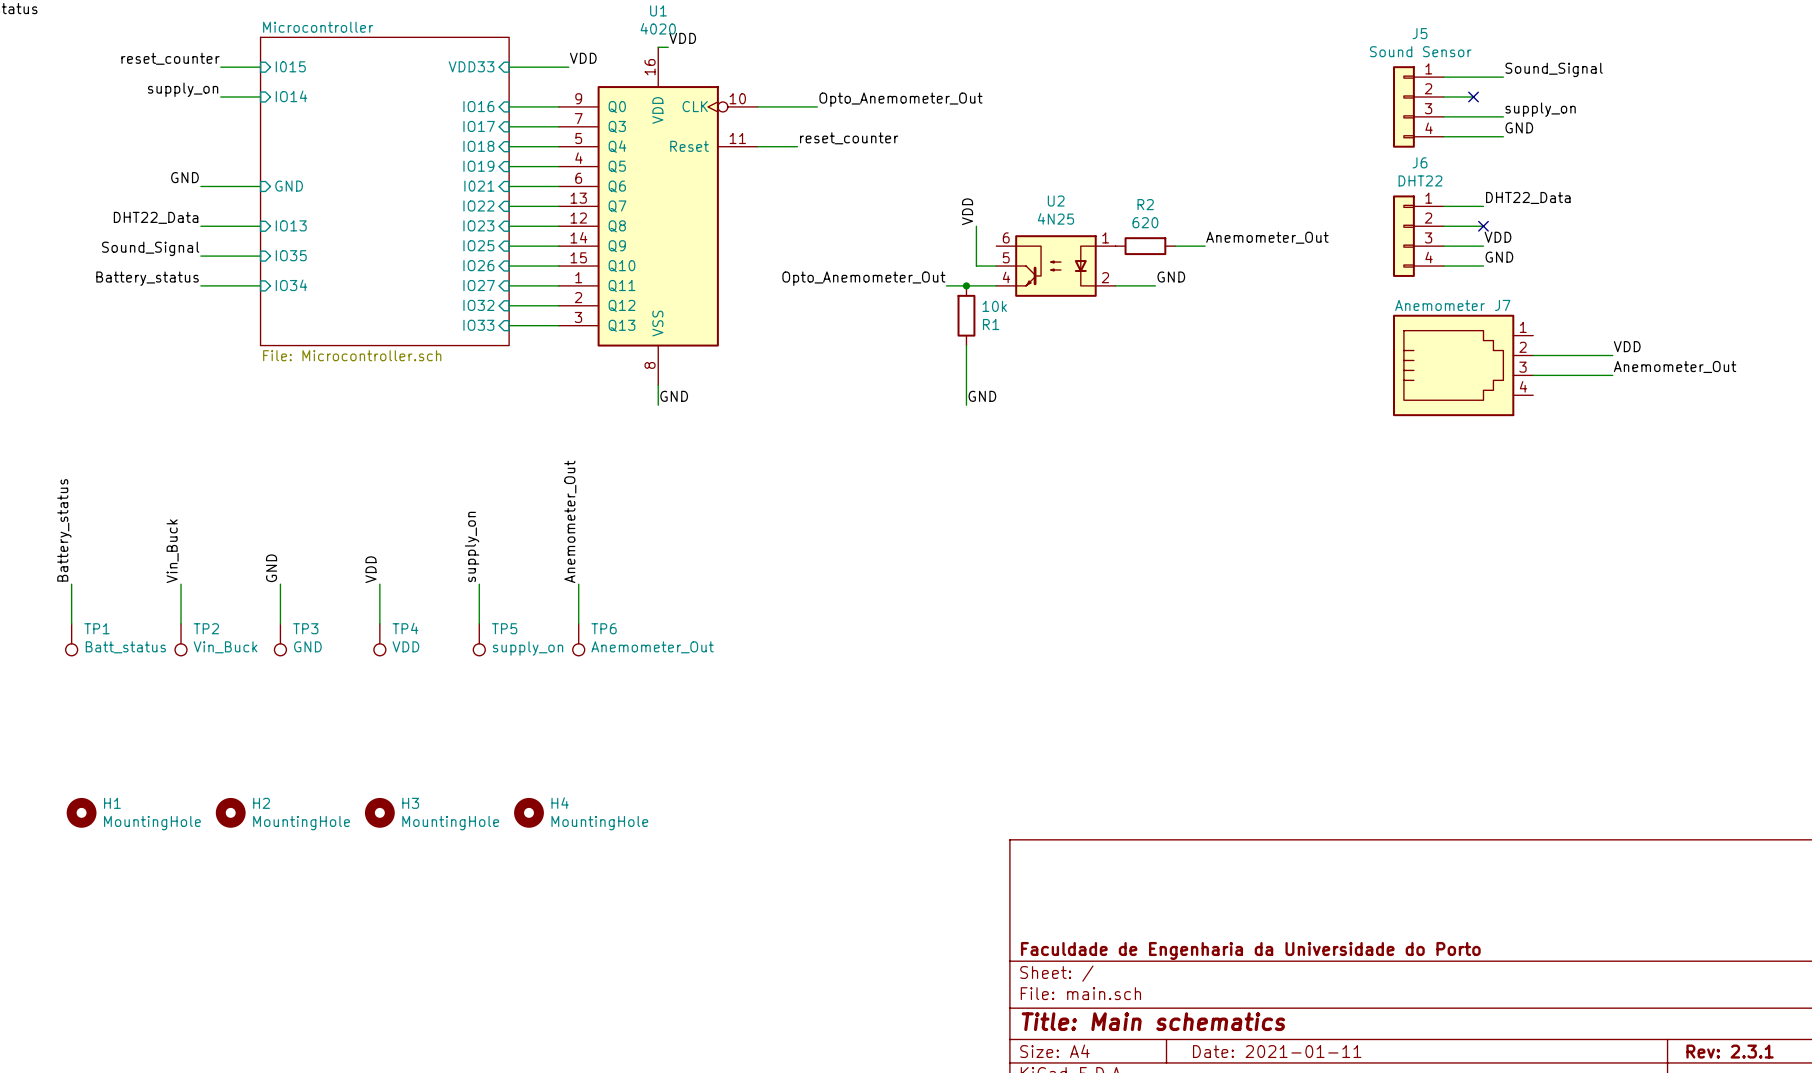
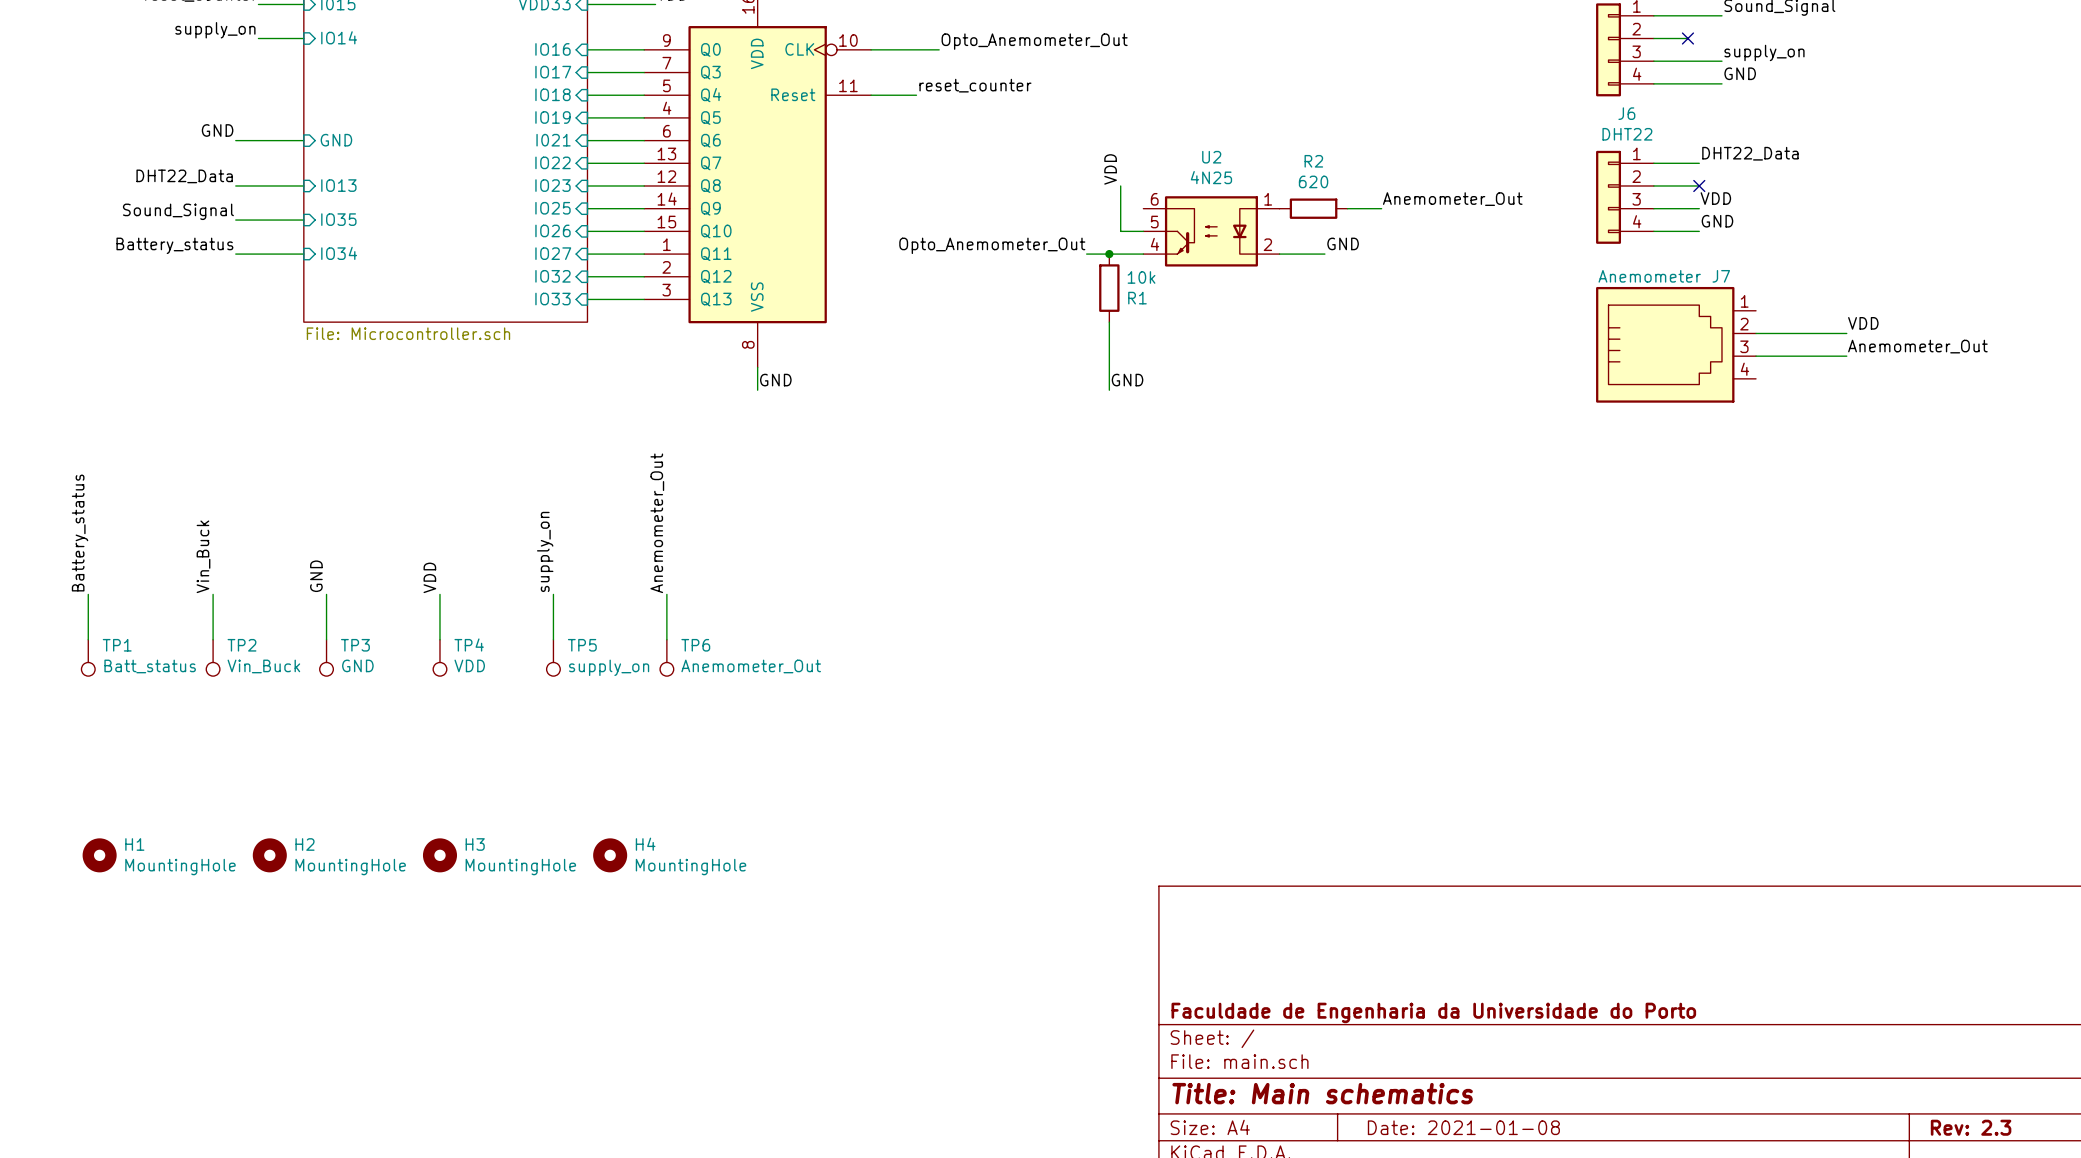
title block: Date: 2021-01-11 (1277, 1051) -> Date: 2021-01-08 (1463, 1127)
title block: Rev: 2.3.1 (1730, 1051) -> Rev: 2.3 (1971, 1127)

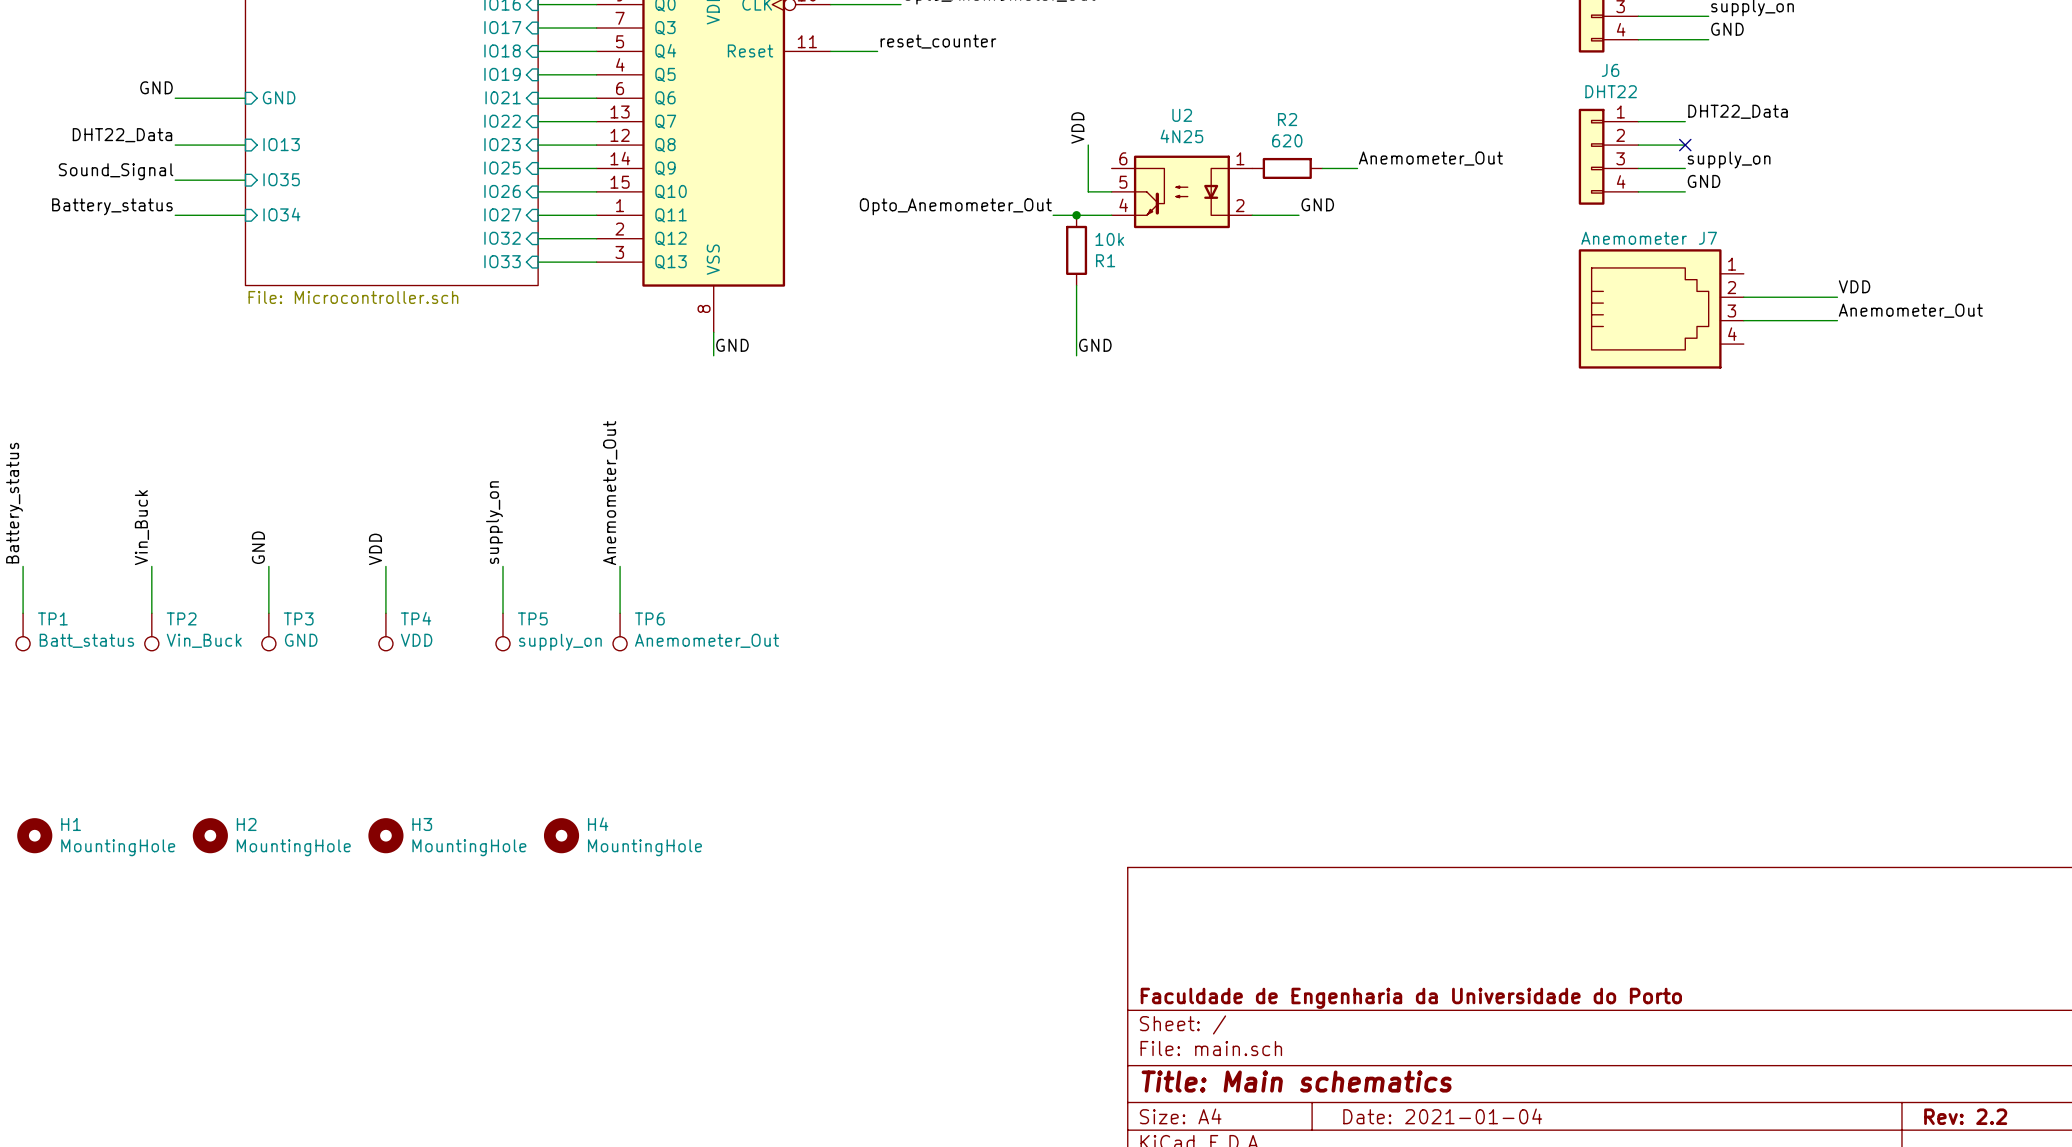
label: VDD (1715, 198) -> supply_on (1729, 159)
title block: Date: 2021-01-08 (1463, 1127) -> Date: 2021-01-04 (1442, 1116)
title block: Rev: 2.3 (1971, 1127) -> Rev: 2.2 (1965, 1116)

